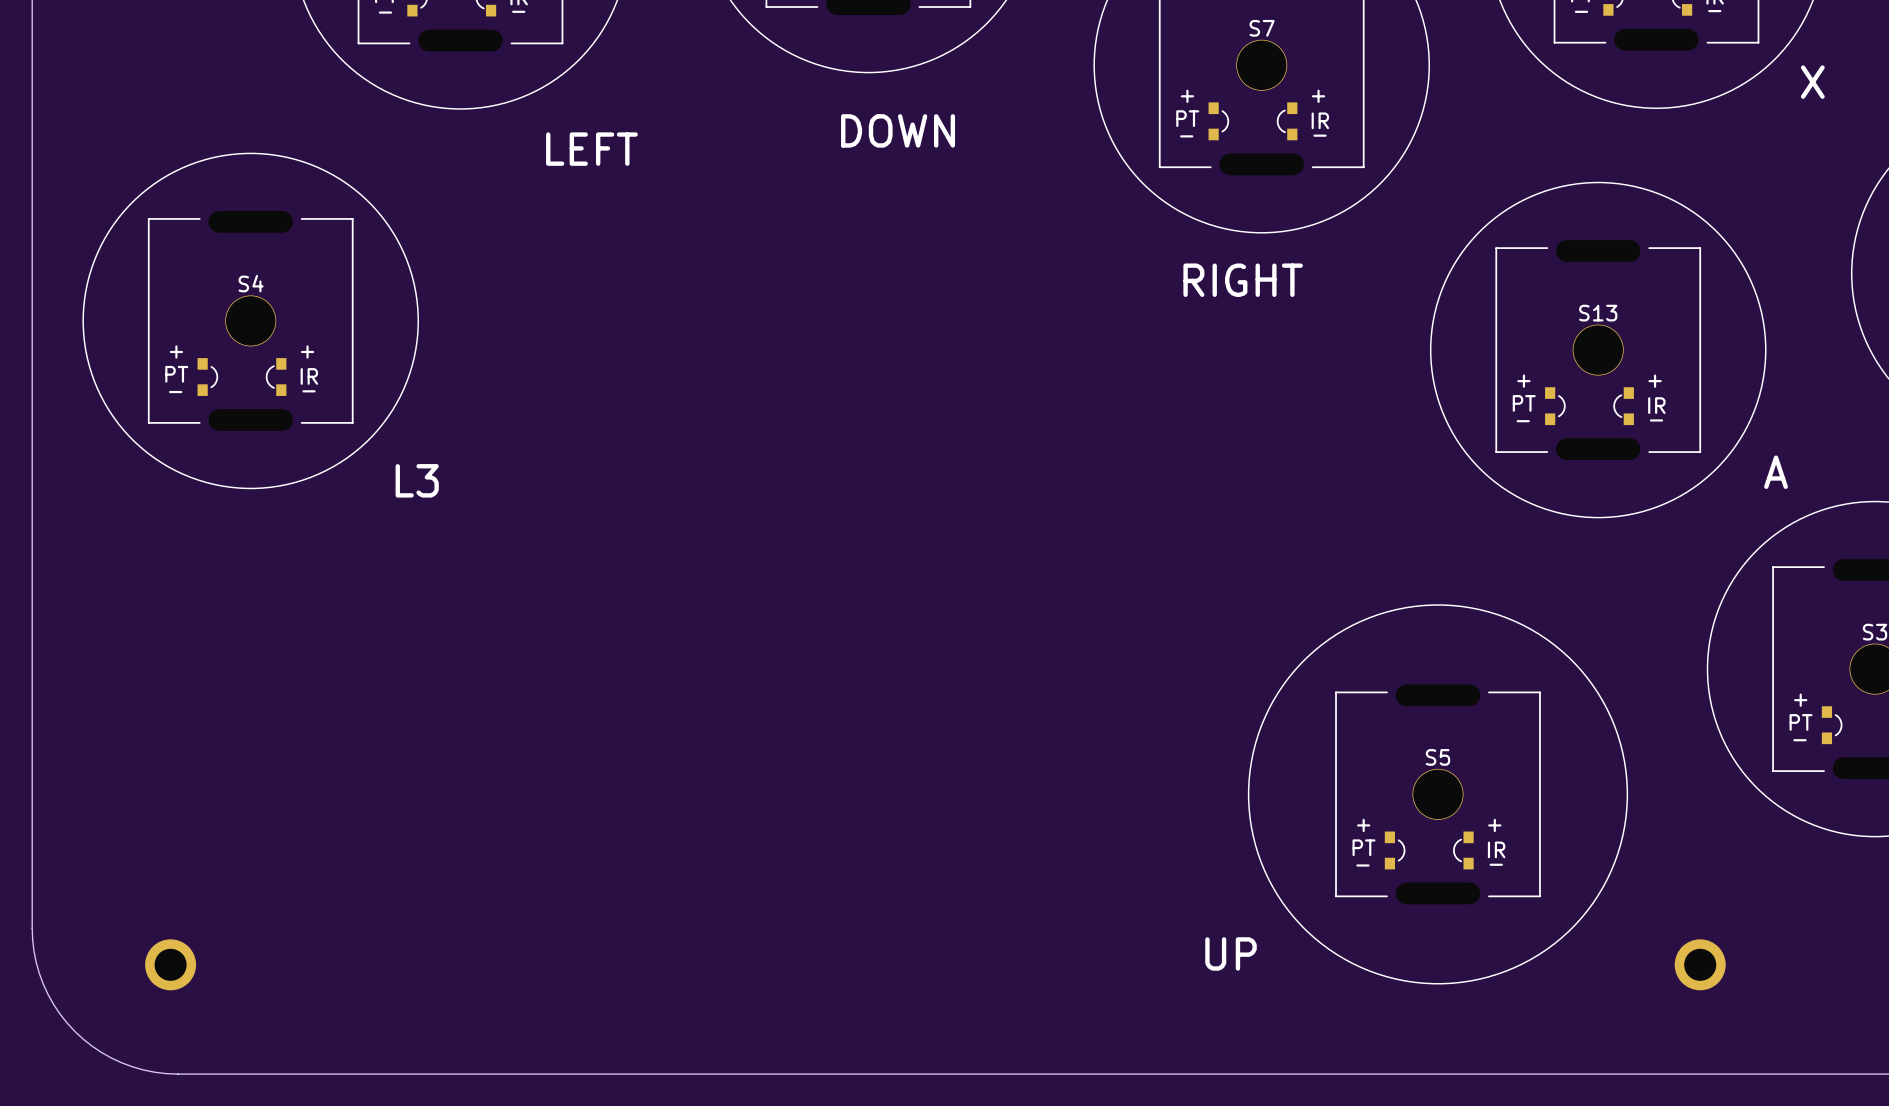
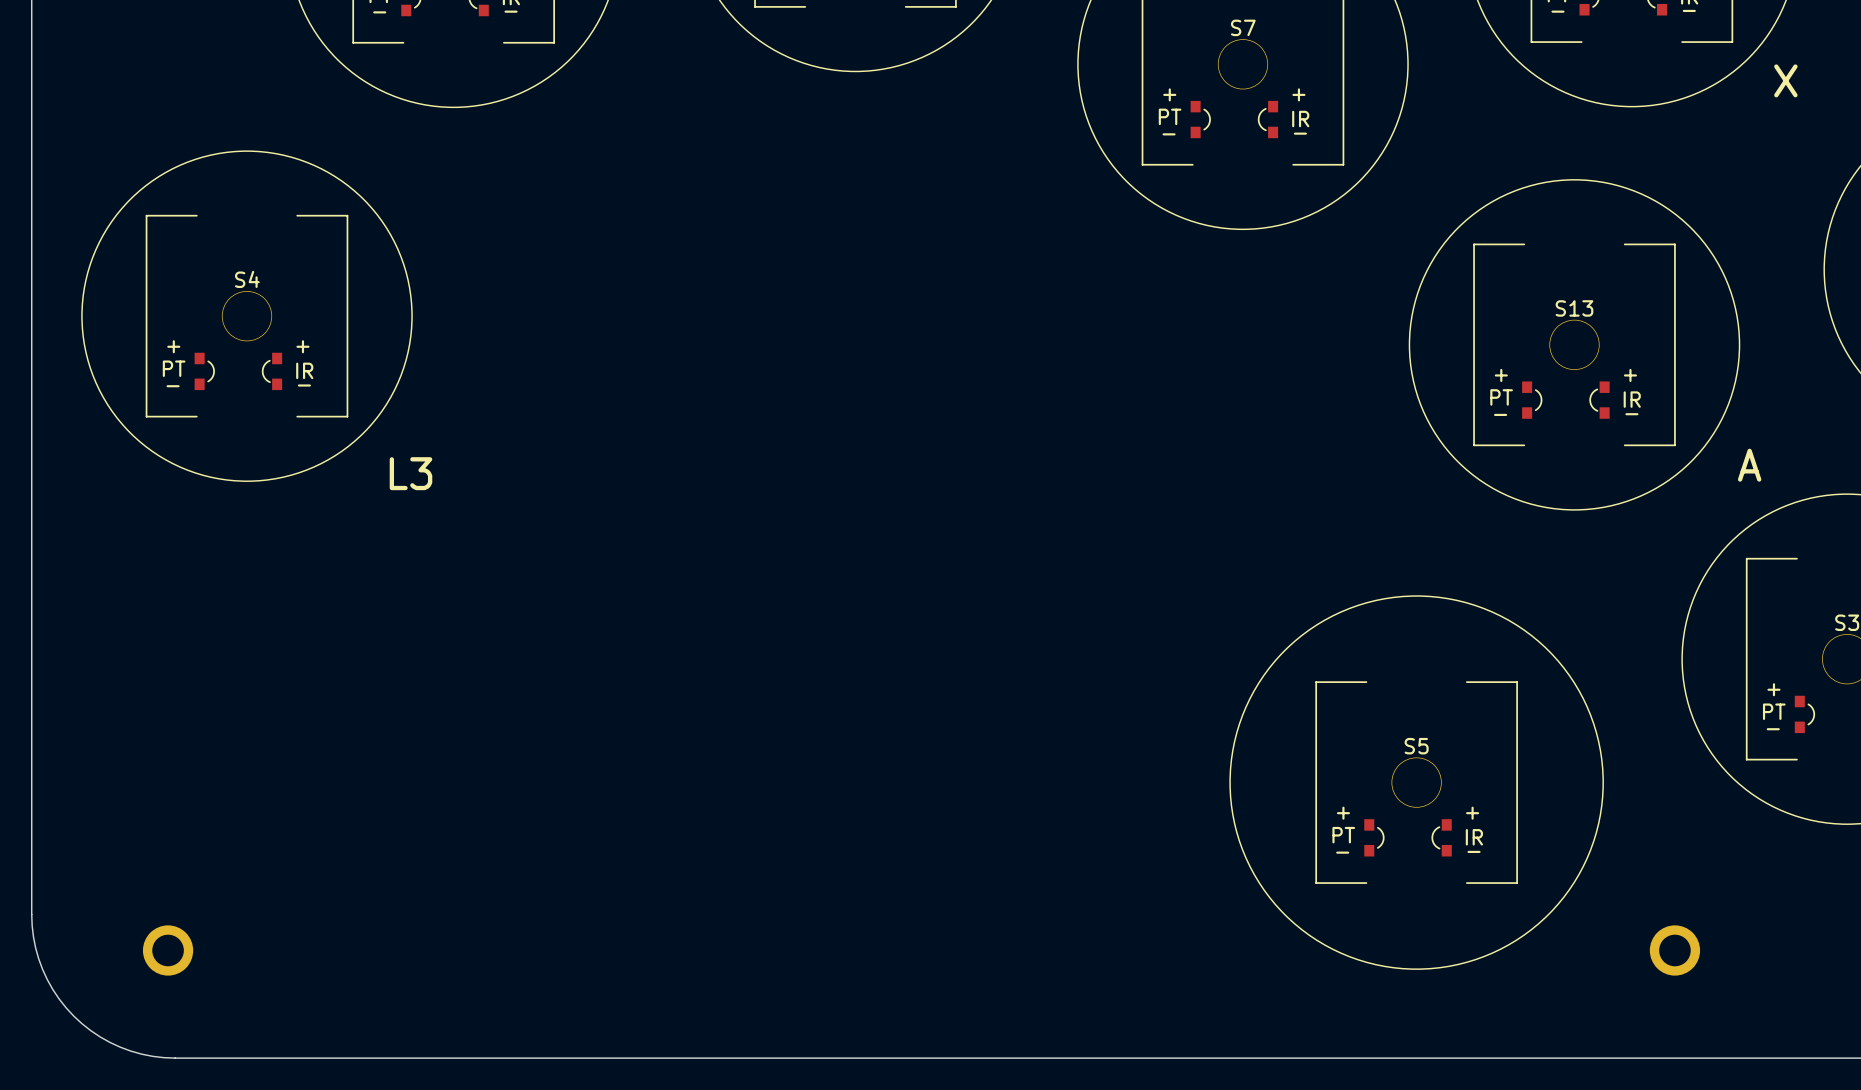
text: DOWN (898, 130) -> none
text: LEFT (591, 149) -> none
text: RIGHT (1243, 280) -> none
text: UP (1231, 953) -> none

